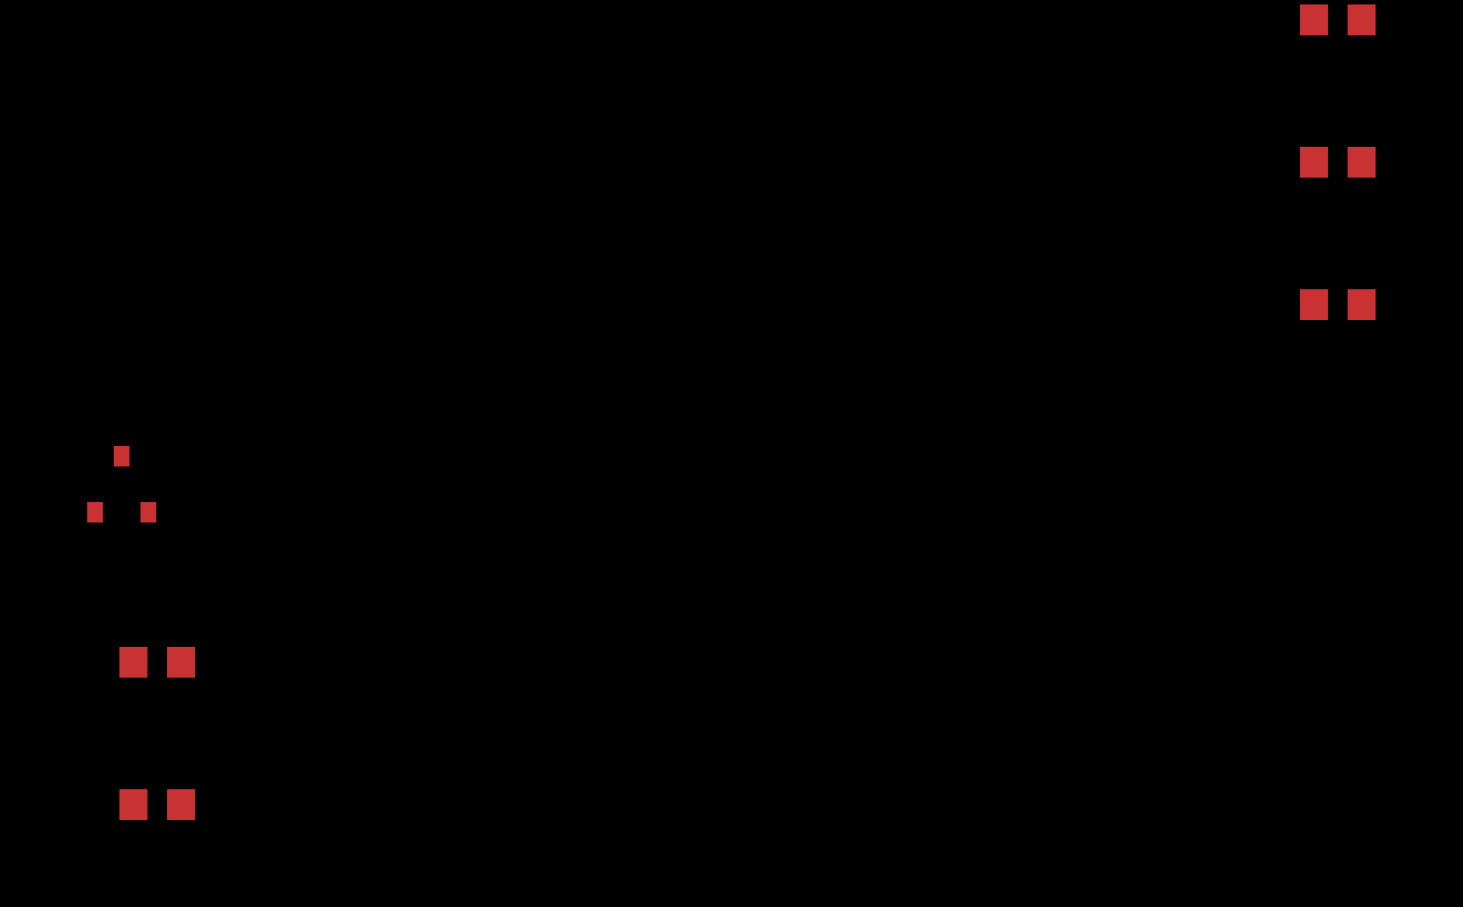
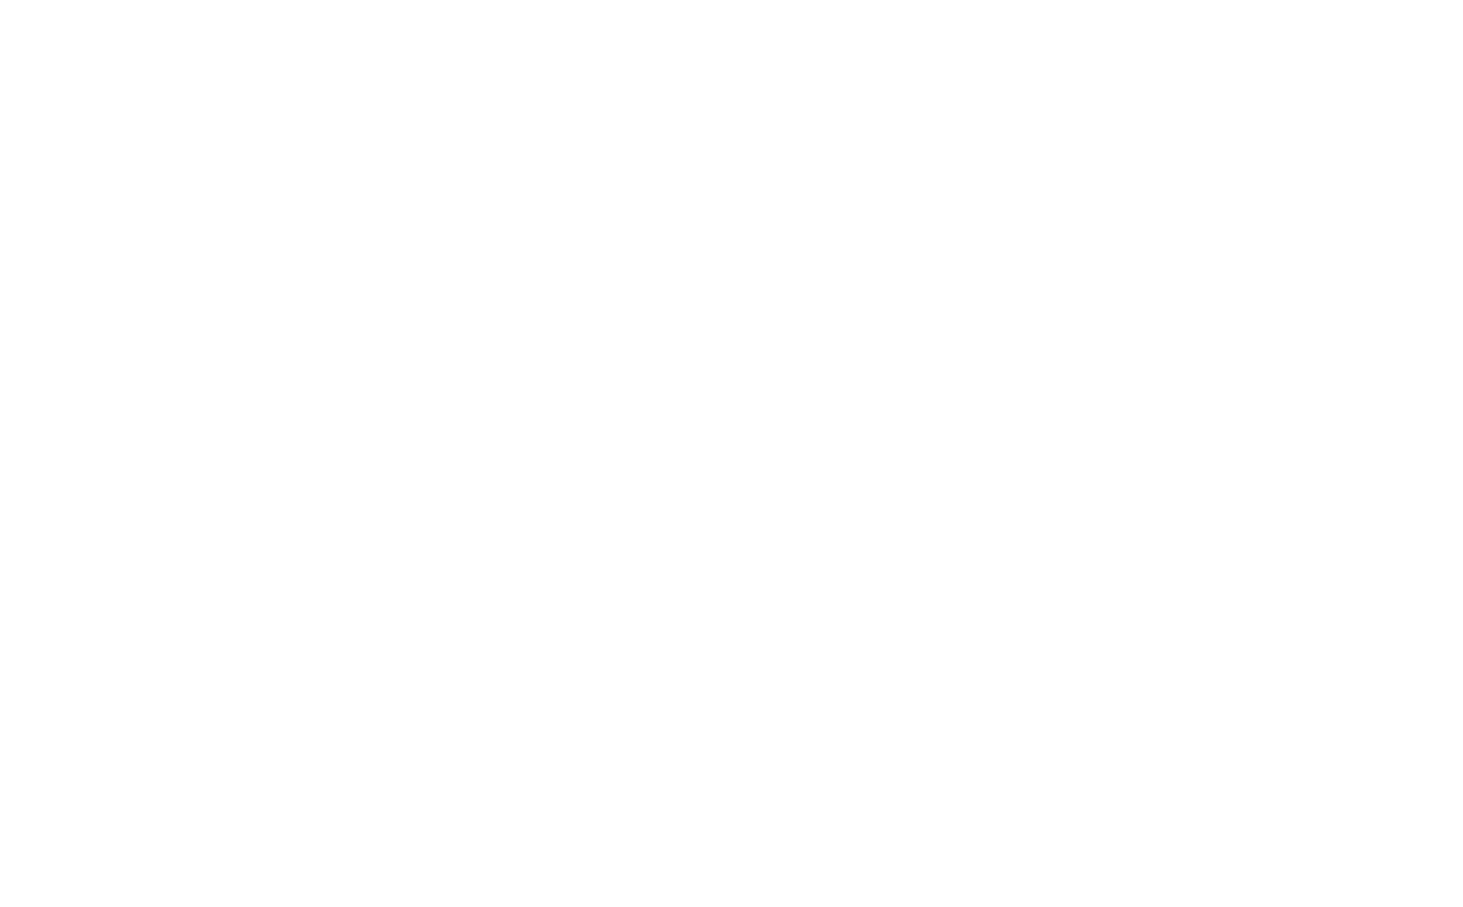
part: (1337, 19) -> none
part: (1337, 162) -> none
part: (1337, 304) -> none
part: (121, 484) -> none
part: (157, 662) -> none
part: (157, 804) -> none

